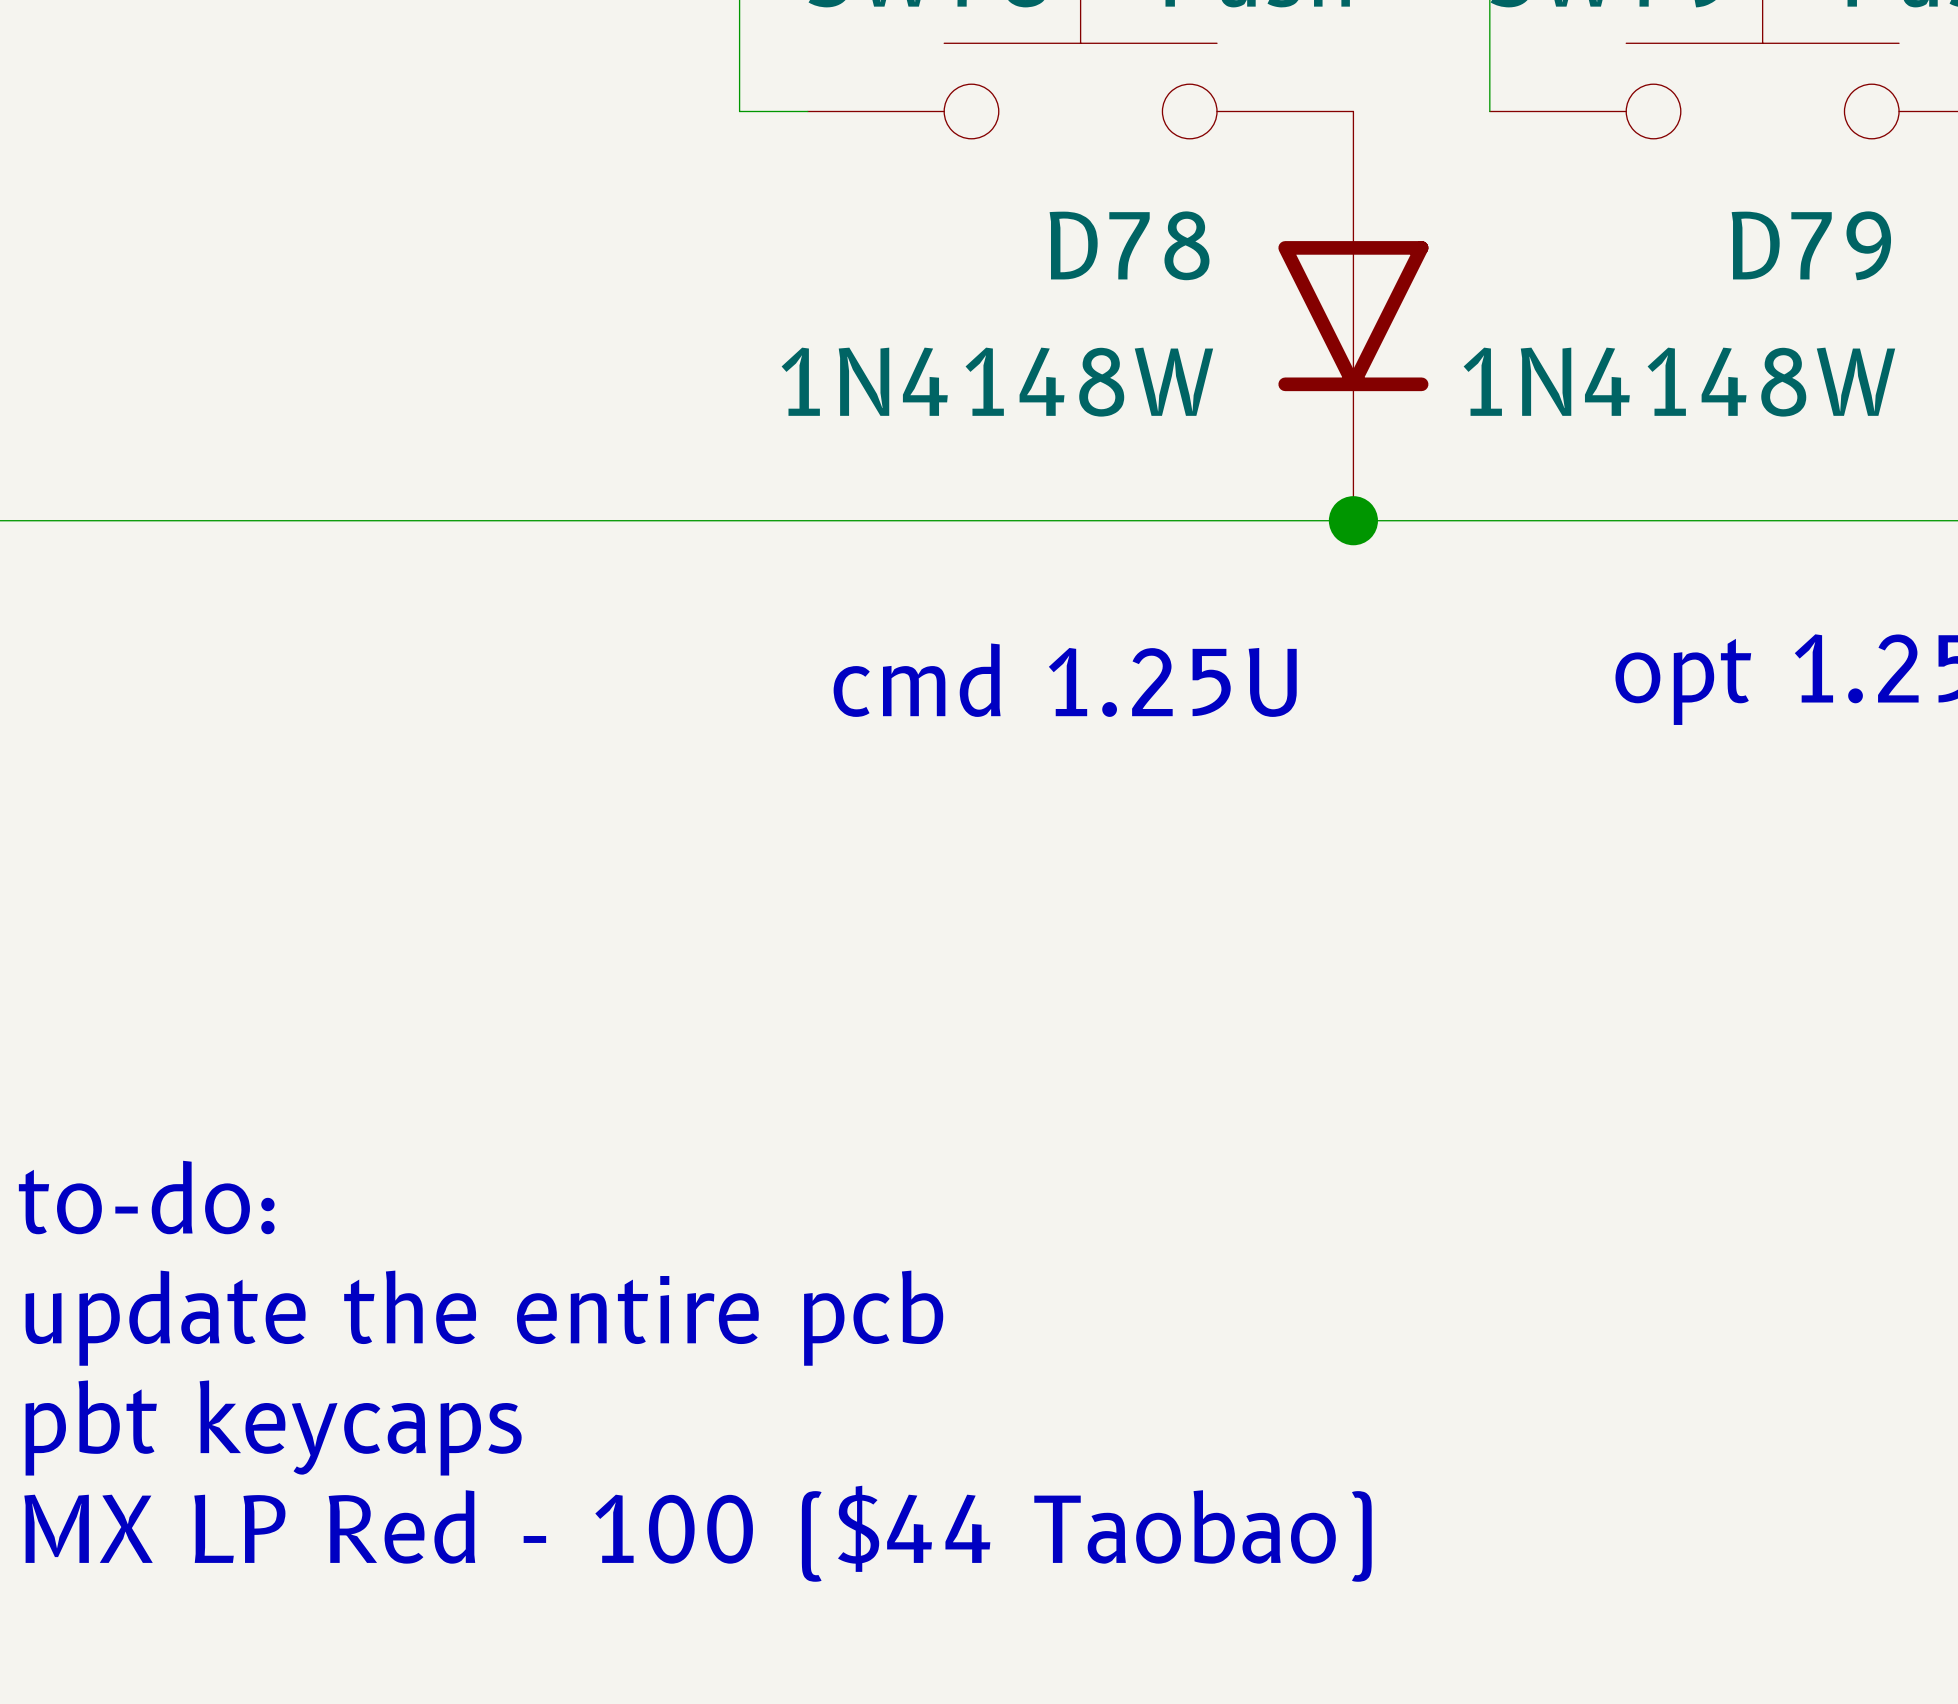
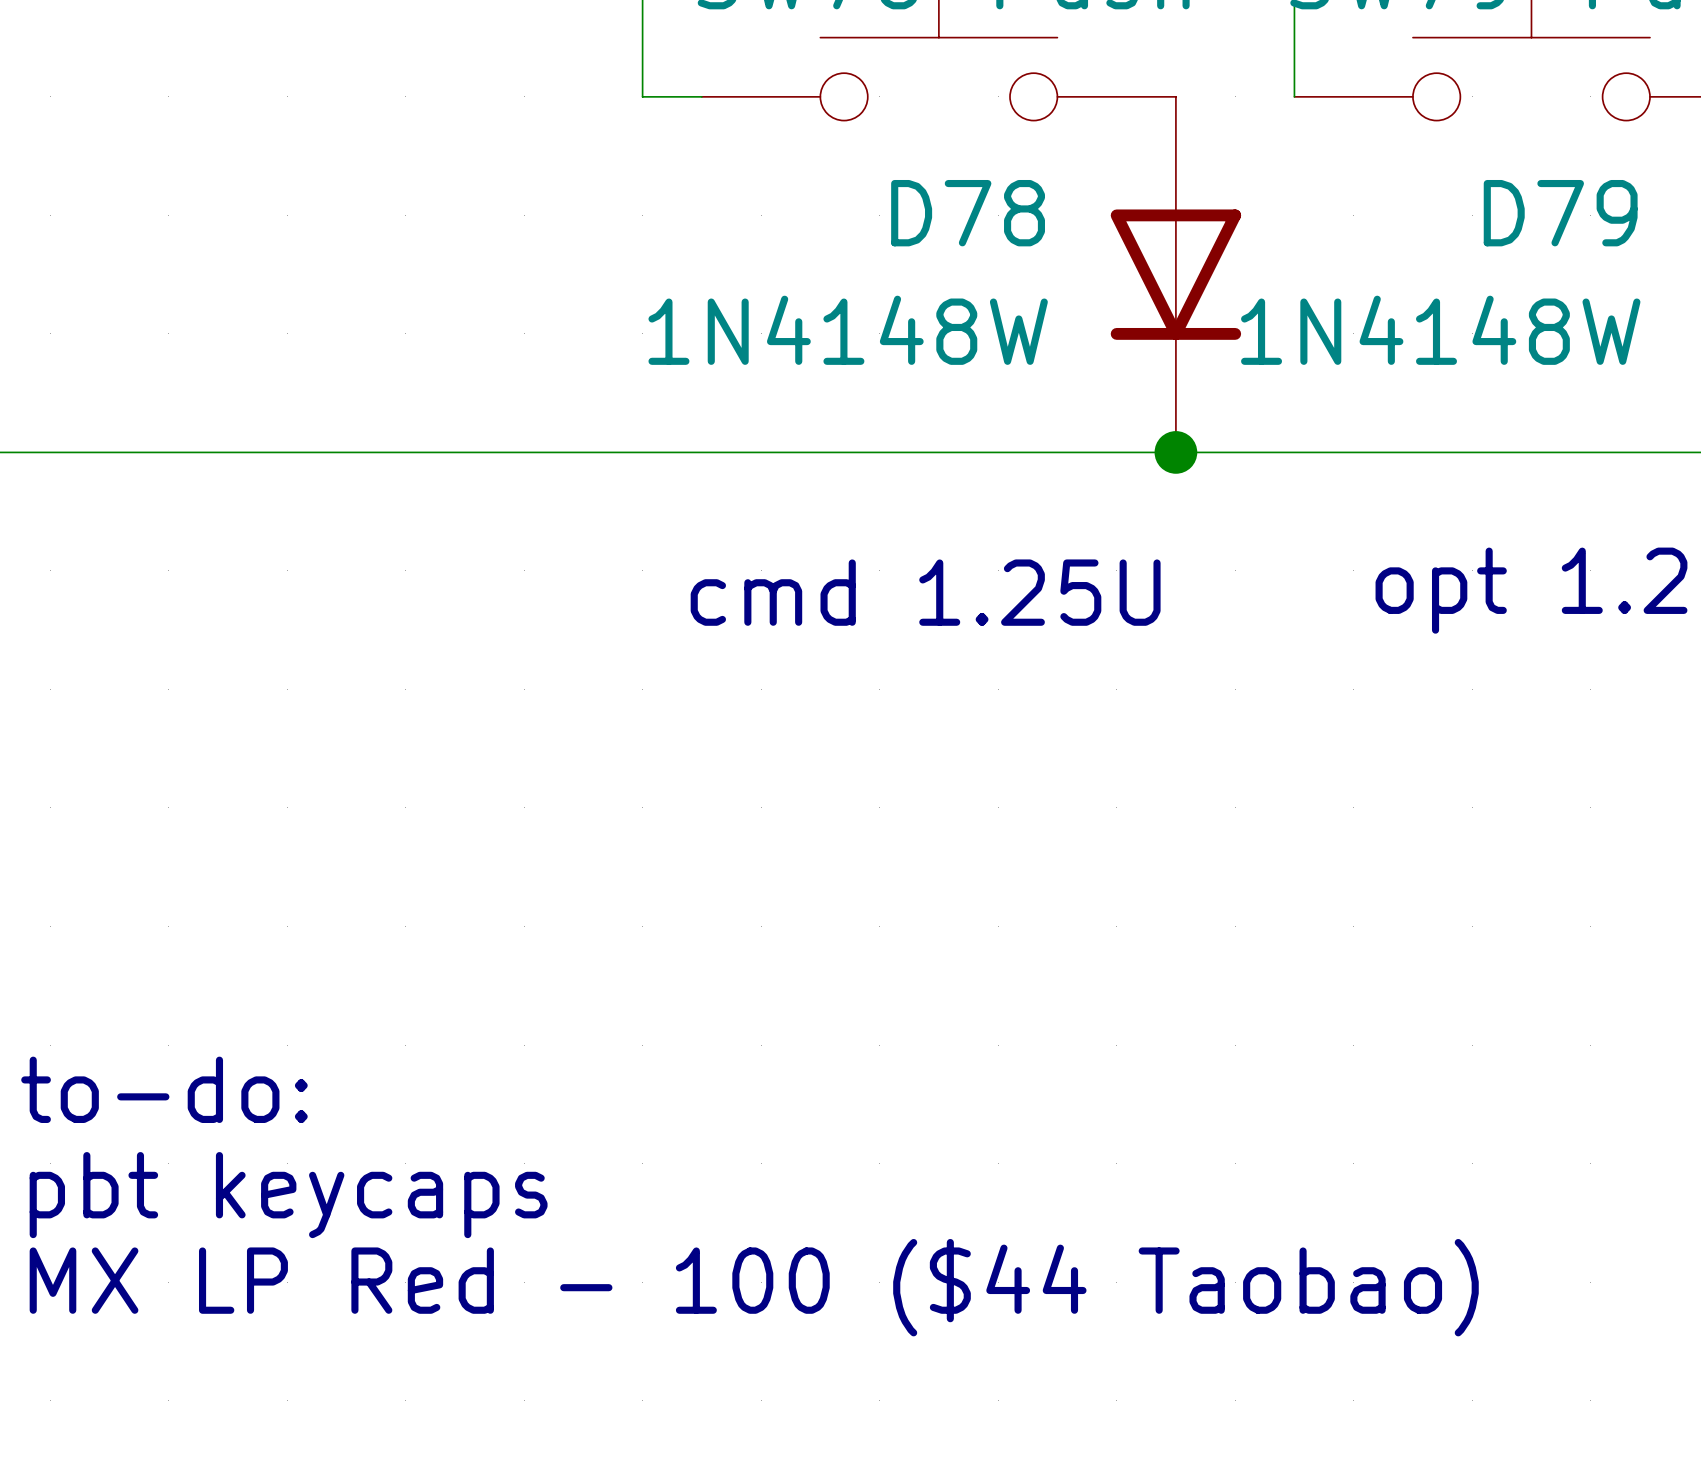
text position: to-do: (146, 1197) -> to-do: (164, 1089)
text: update the entire pcb (484, 1318) -> none
text position: pbt keycaps (273, 1427) -> pbt keycaps (288, 1195)
text position: MX LP Red - 100 ($44 Taobao) (698, 1533) -> MX LP Red - 100 ($44 Taobao) (754, 1287)

